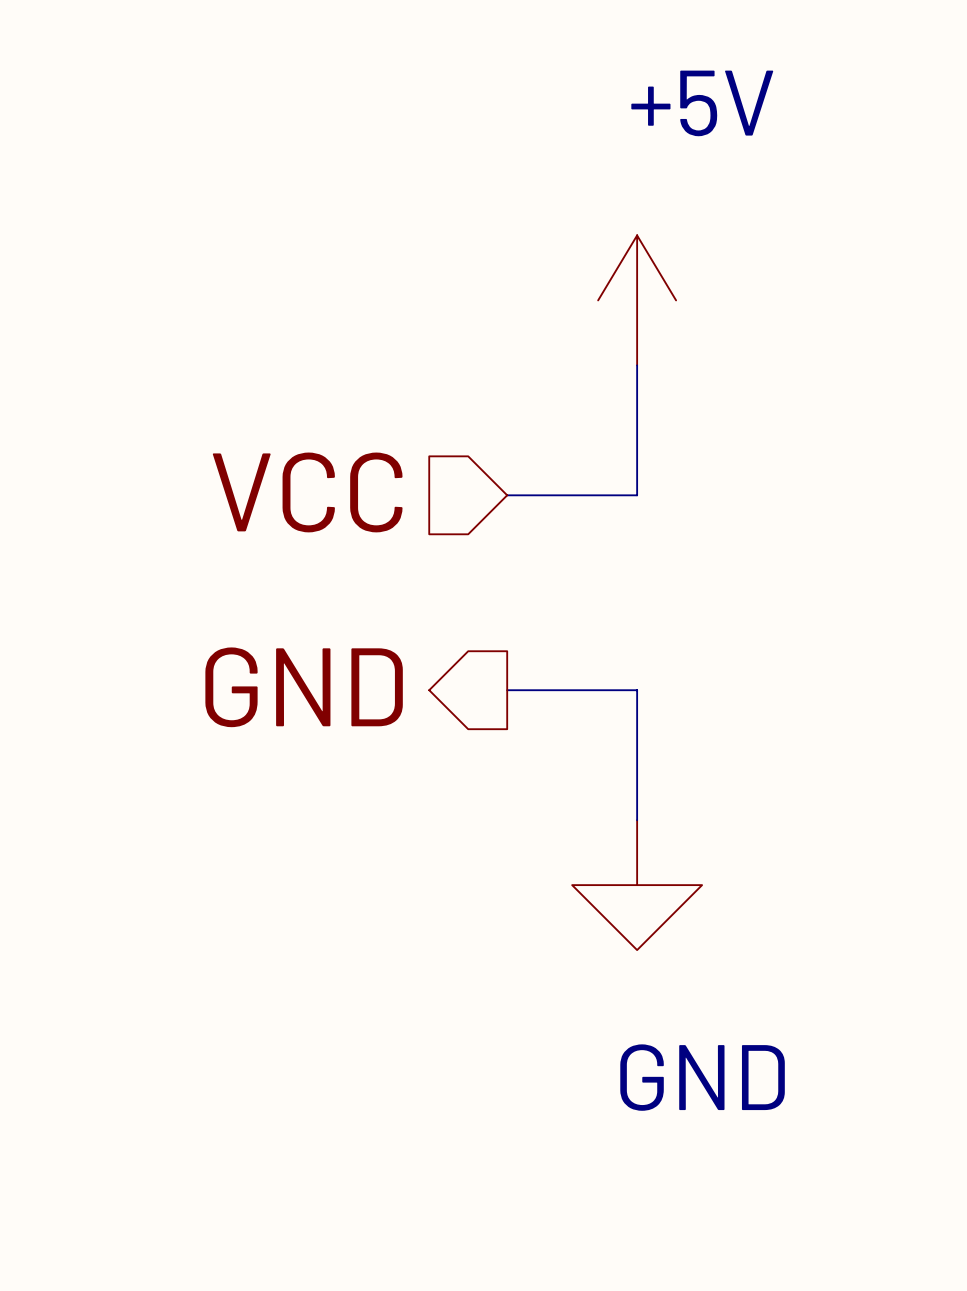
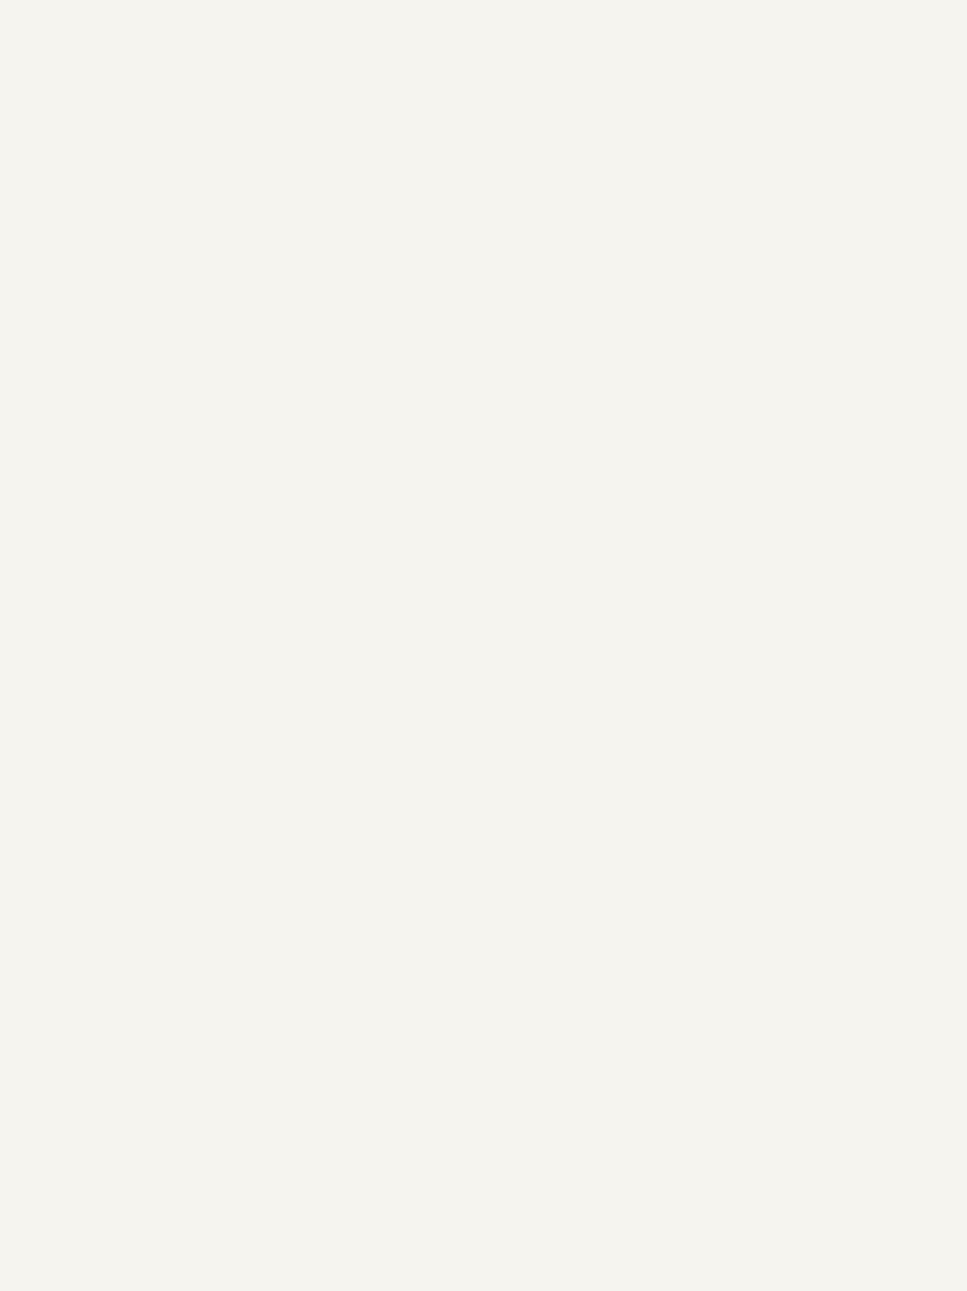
power symbol: +5V (637, 300) -> none
wire: (637, 365) (637, 495) (507, 495) -> none
hierarchical label: VCC (307, 492) -> none
hierarchical label: GND (304, 687) -> none
wire: (507, 690) (637, 690) (637, 820) -> none
power symbol: GND (637, 885) -> none

